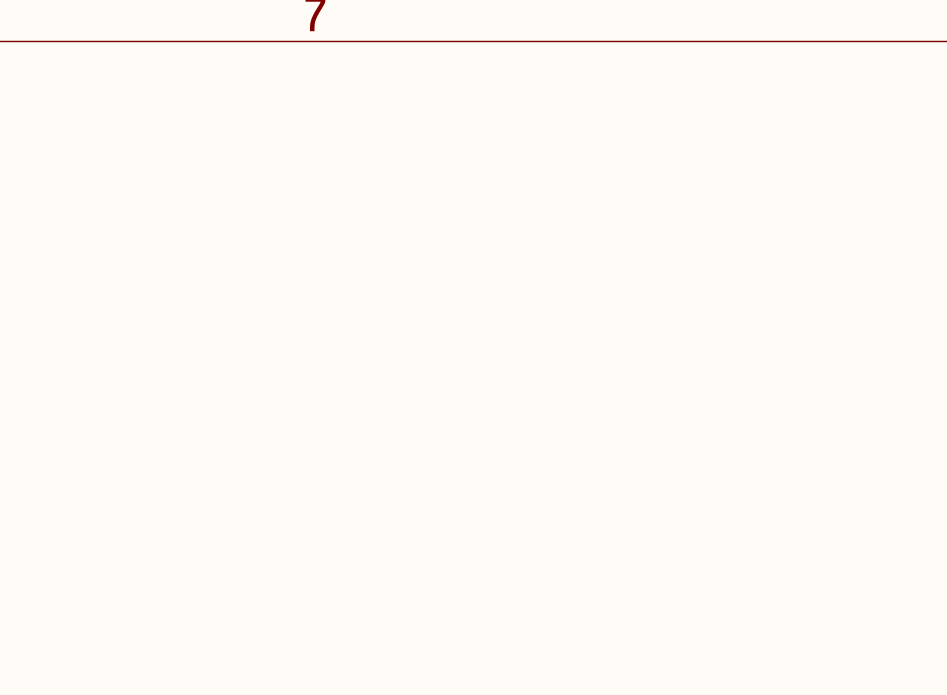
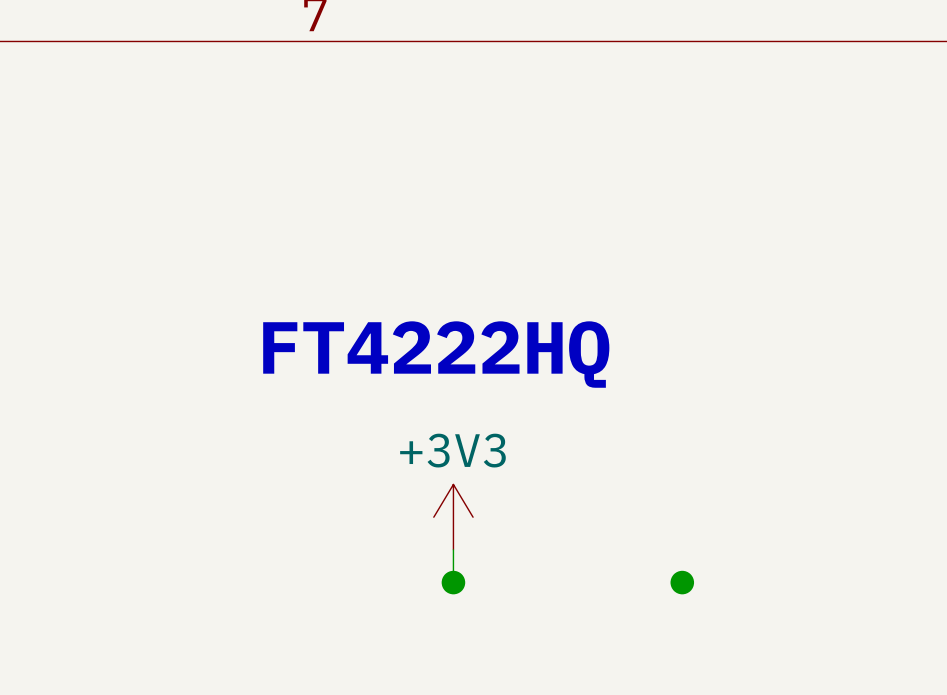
text: none -> FT4222HQ (436, 354)
power symbol: none -> +3V3 (453, 517)
wire: none -> (453, 549) (453, 582)
junction: none -> (453, 582)
junction: none -> (682, 582)

